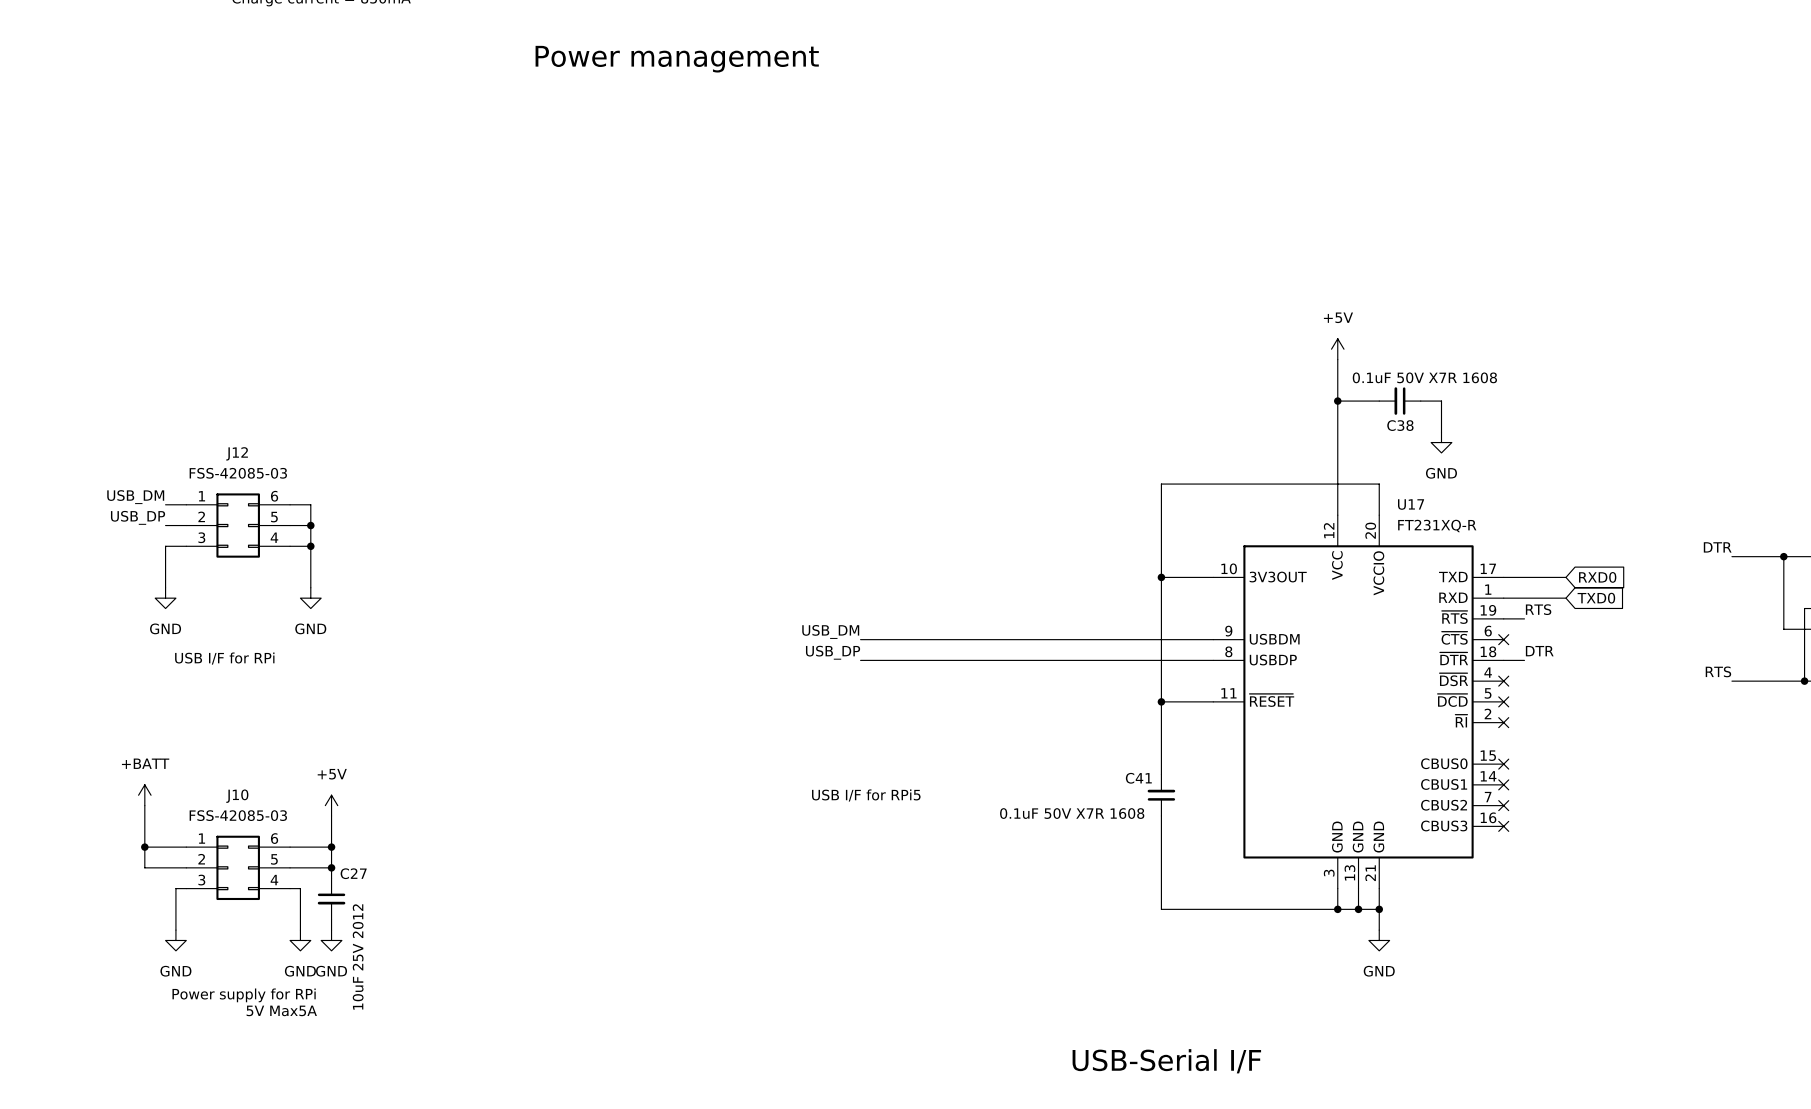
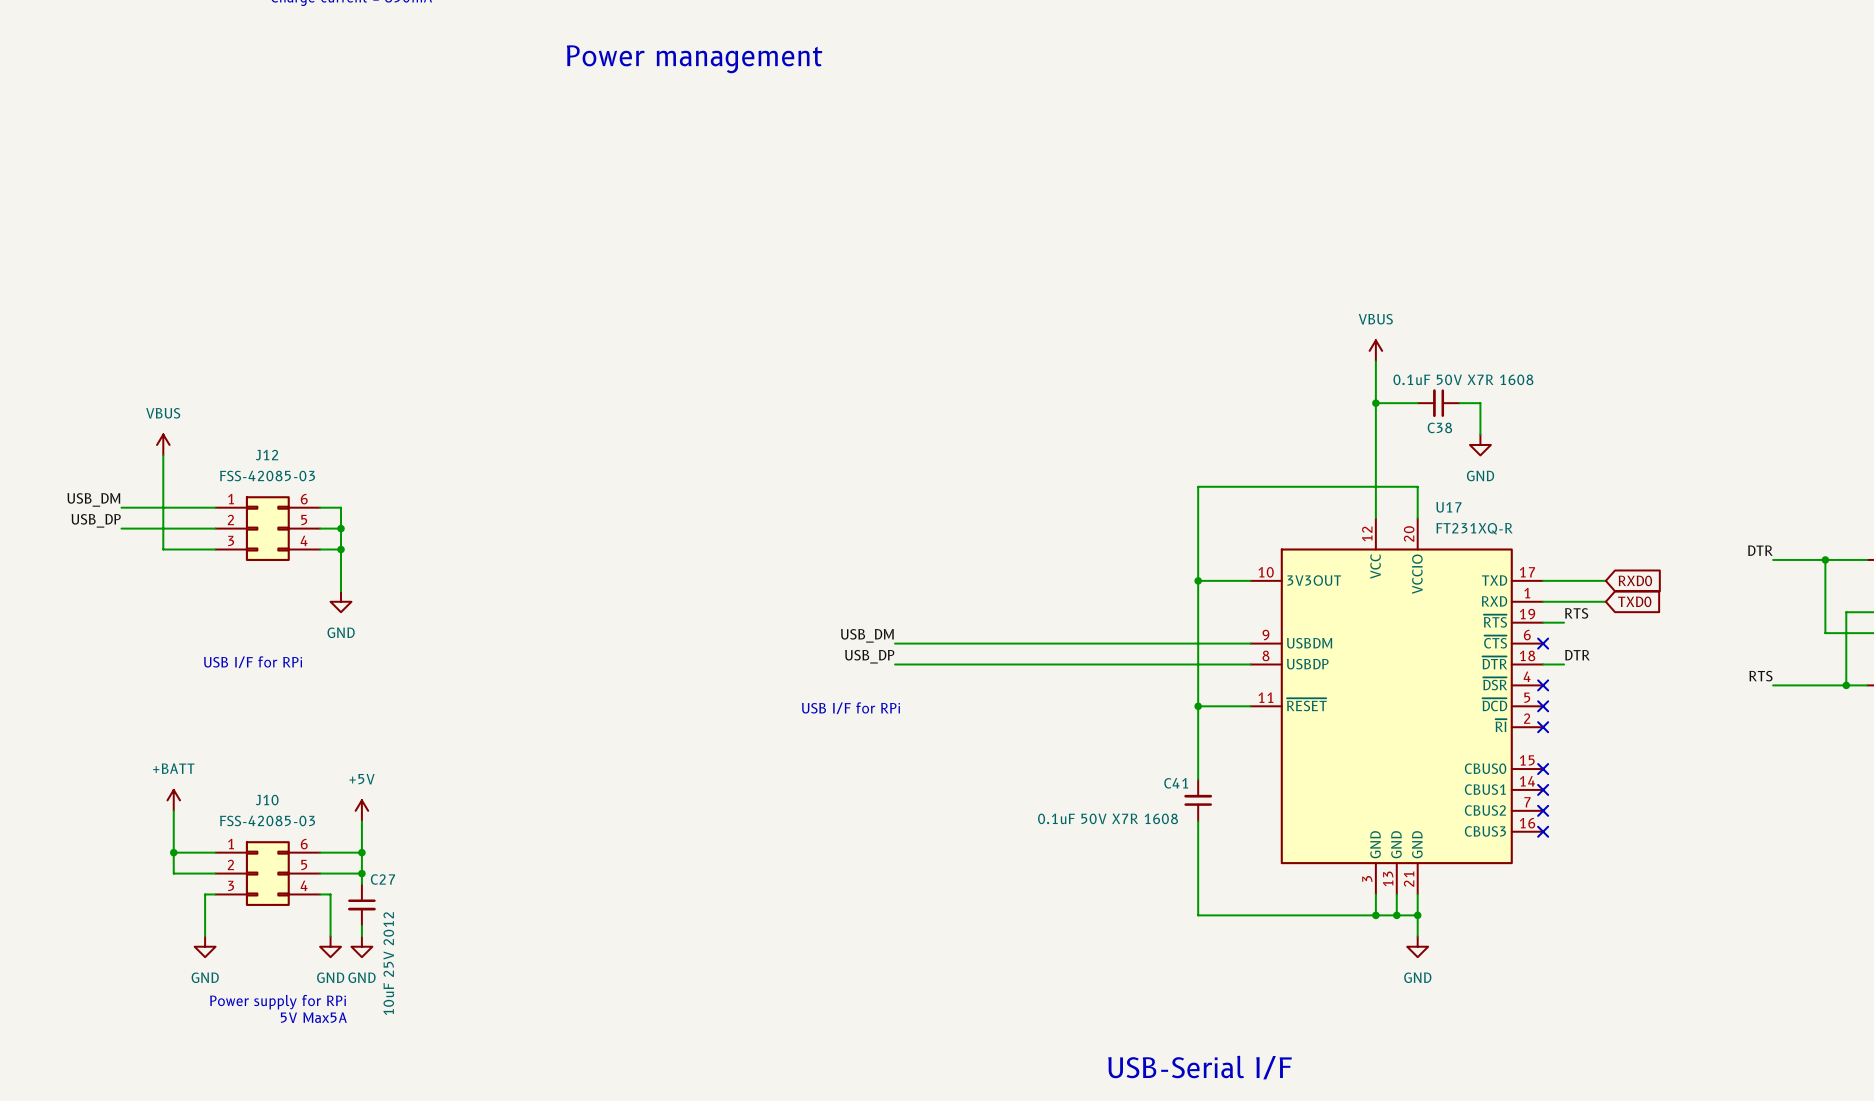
power symbol: +5V (1337, 349) -> VBUS (1375, 350)
power symbol: none -> VBUS (163, 444)
label position: USB_DM (135, 497) -> USB_DM (93, 499)
wire: none -> (121, 507) (194, 507)
label position: USB_DP (138, 517) -> USB_DP (96, 520)
wire: none -> (121, 528) (194, 528)
wire: (165, 546) (165, 587) -> (194, 549) (163, 549) (163, 455)
power symbol: GND (165, 598) -> none
text: none -> USB I/F for RPi (850, 708)
text: USB I/F for RPi5 (866, 795) -> none

